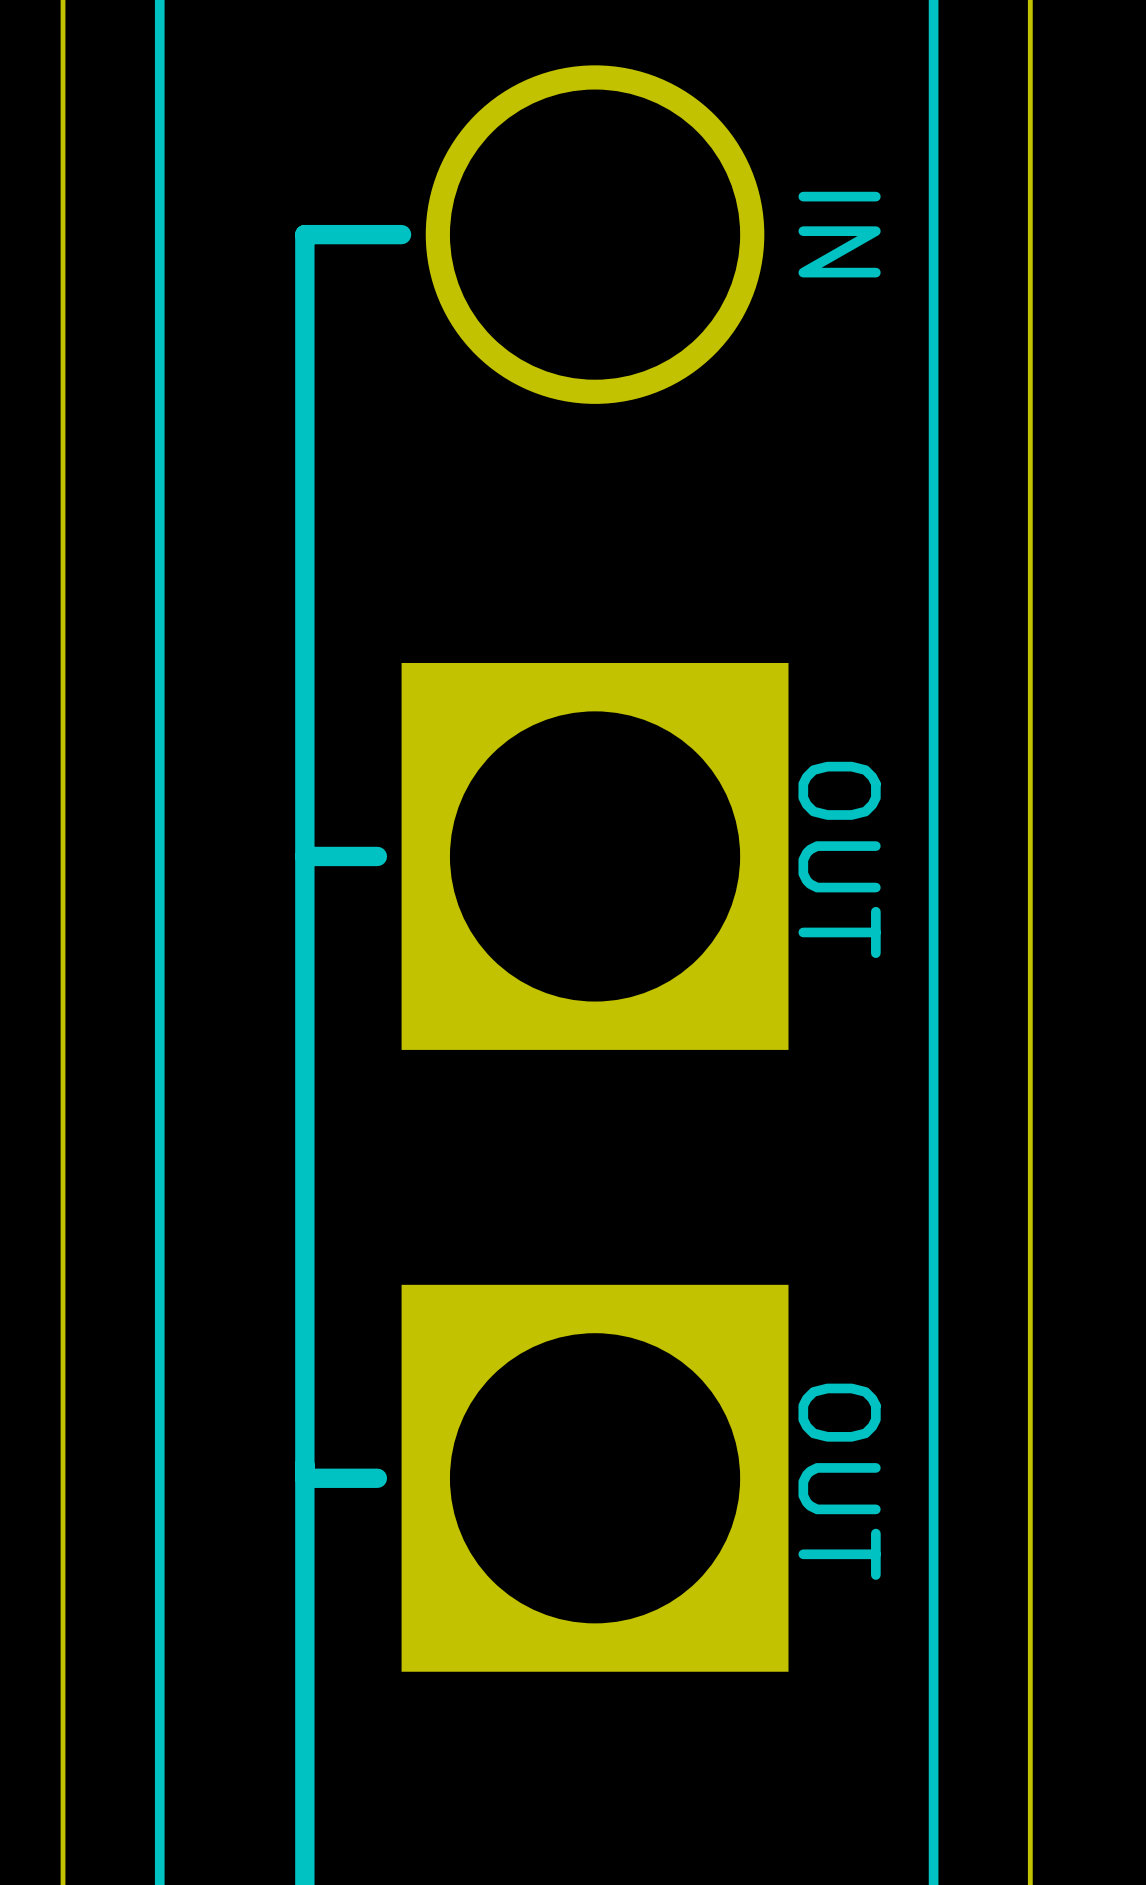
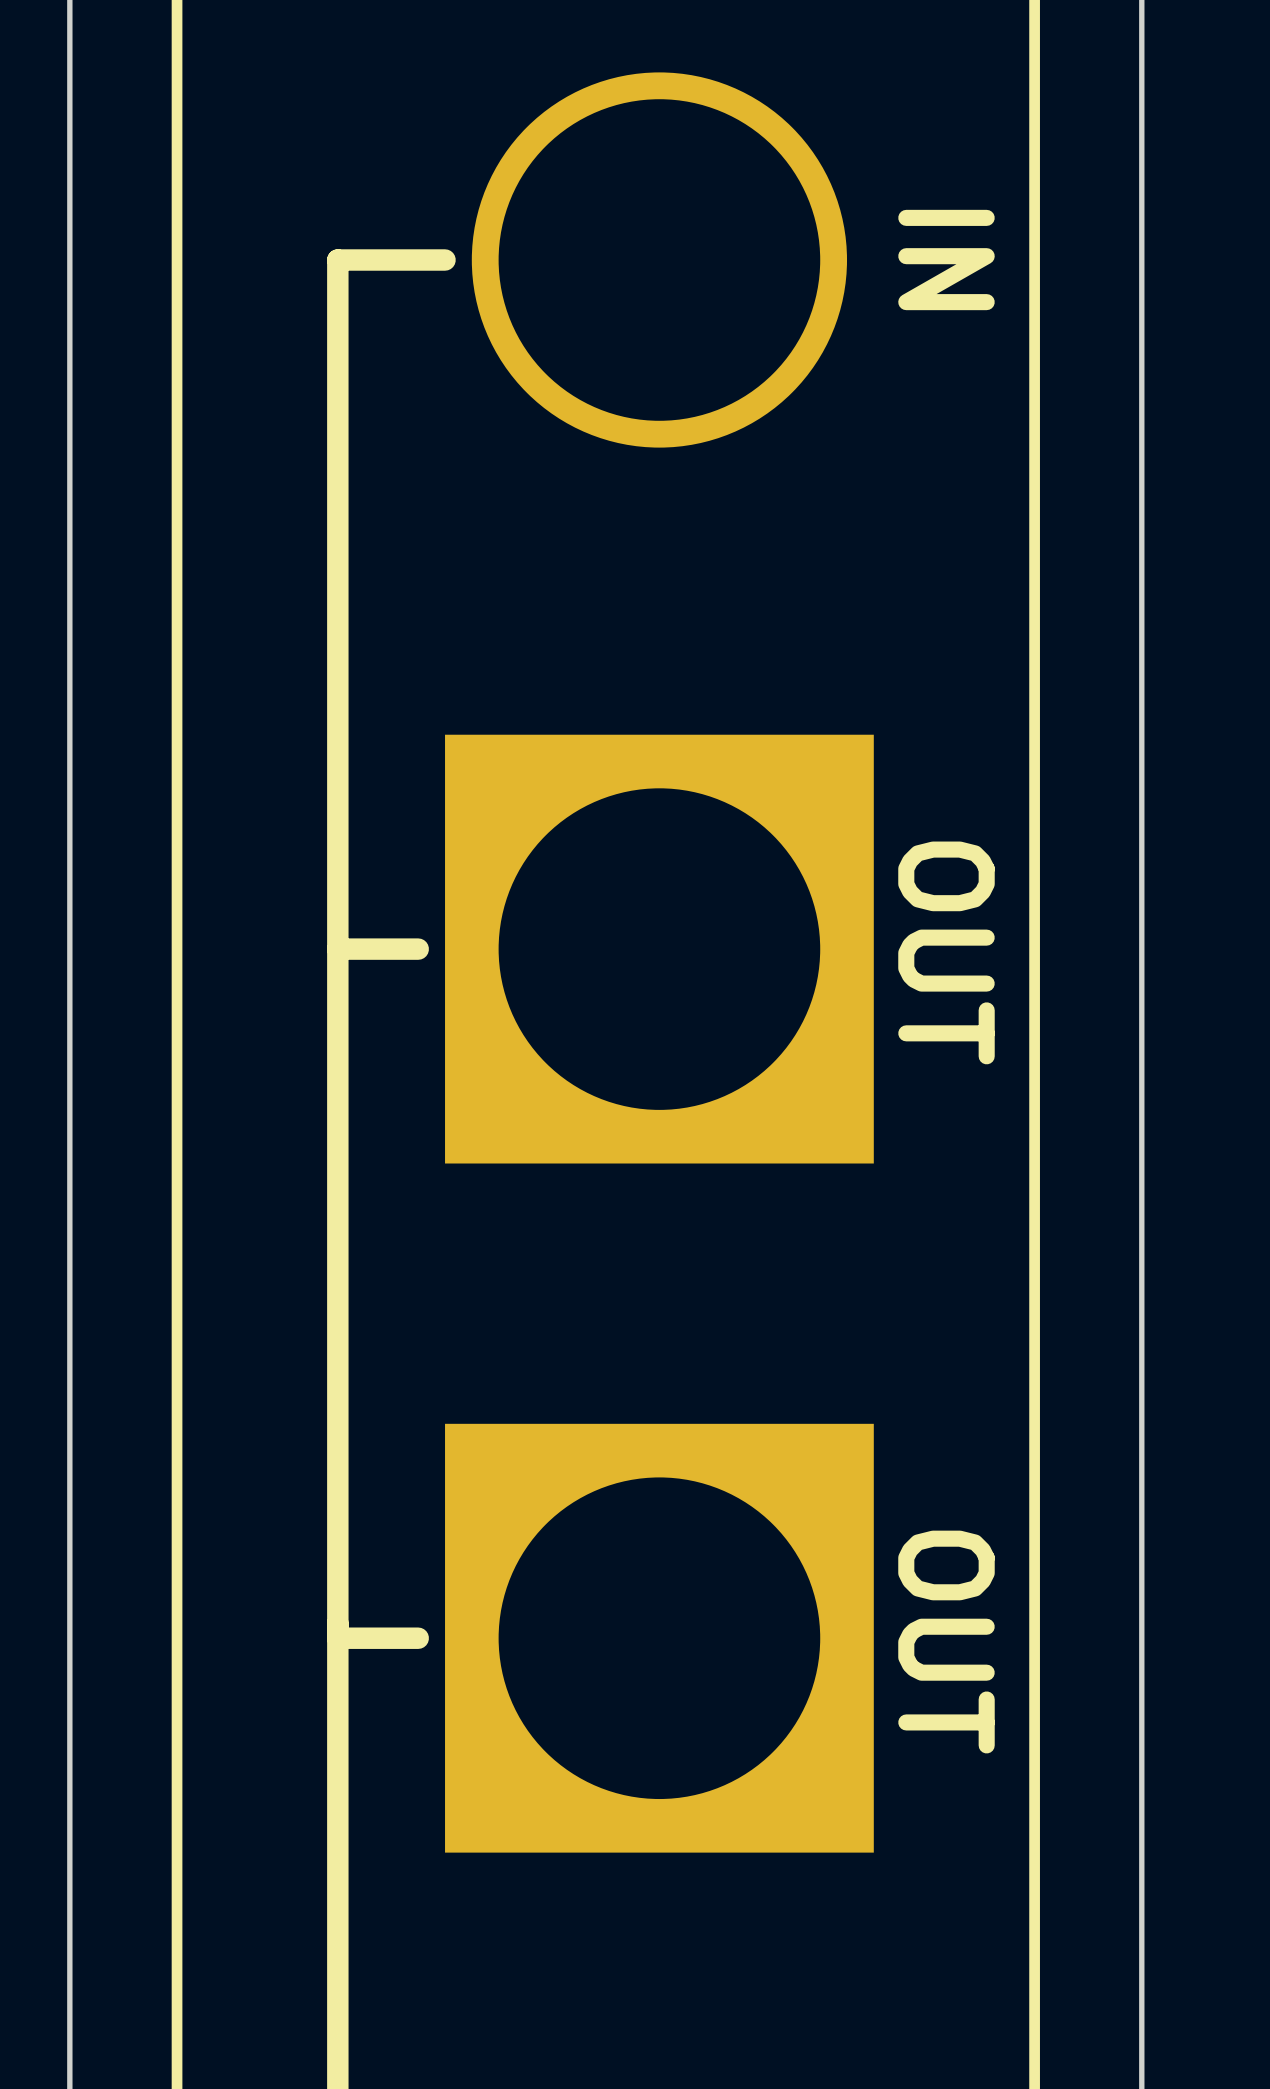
IN name position: IN (839, 234) -> IN (946, 260)
OUT name position: OUT (839, 859) -> OUT (946, 952)
OUT name position: OUT (839, 1481) -> OUT (946, 1642)

